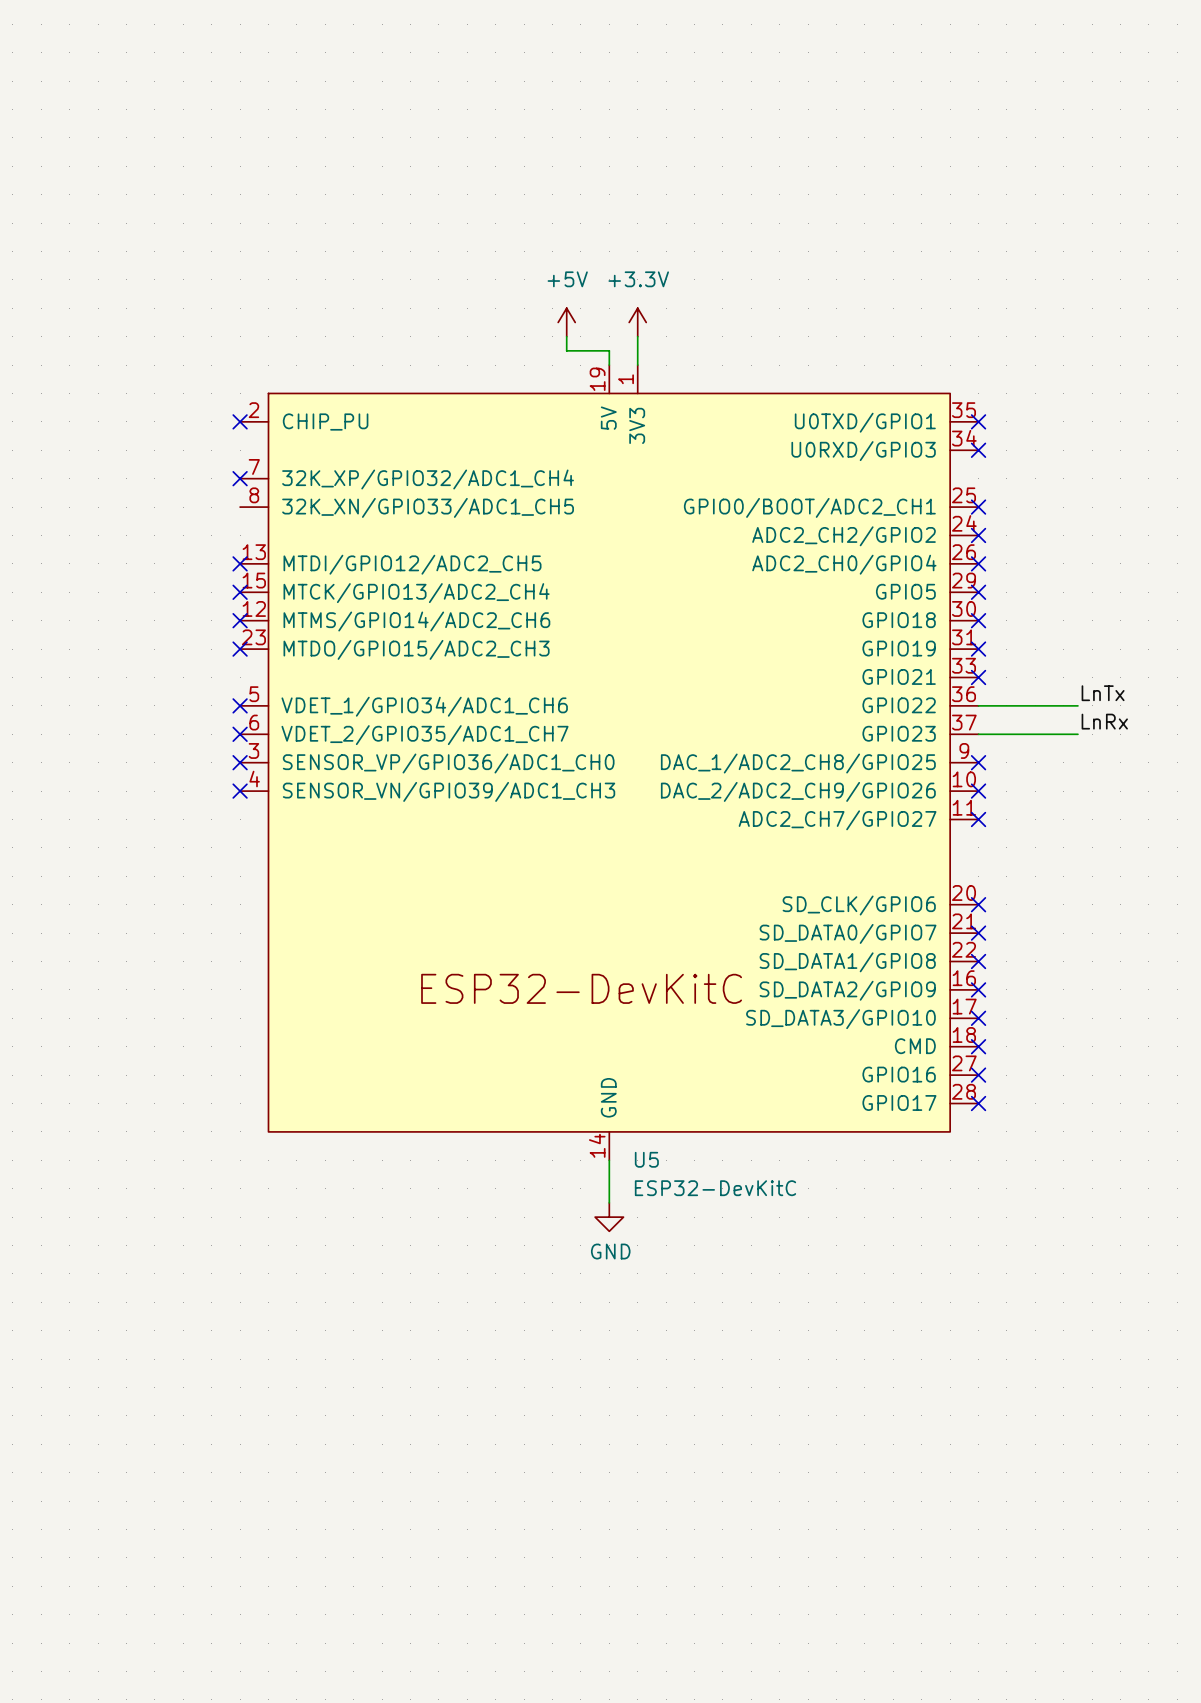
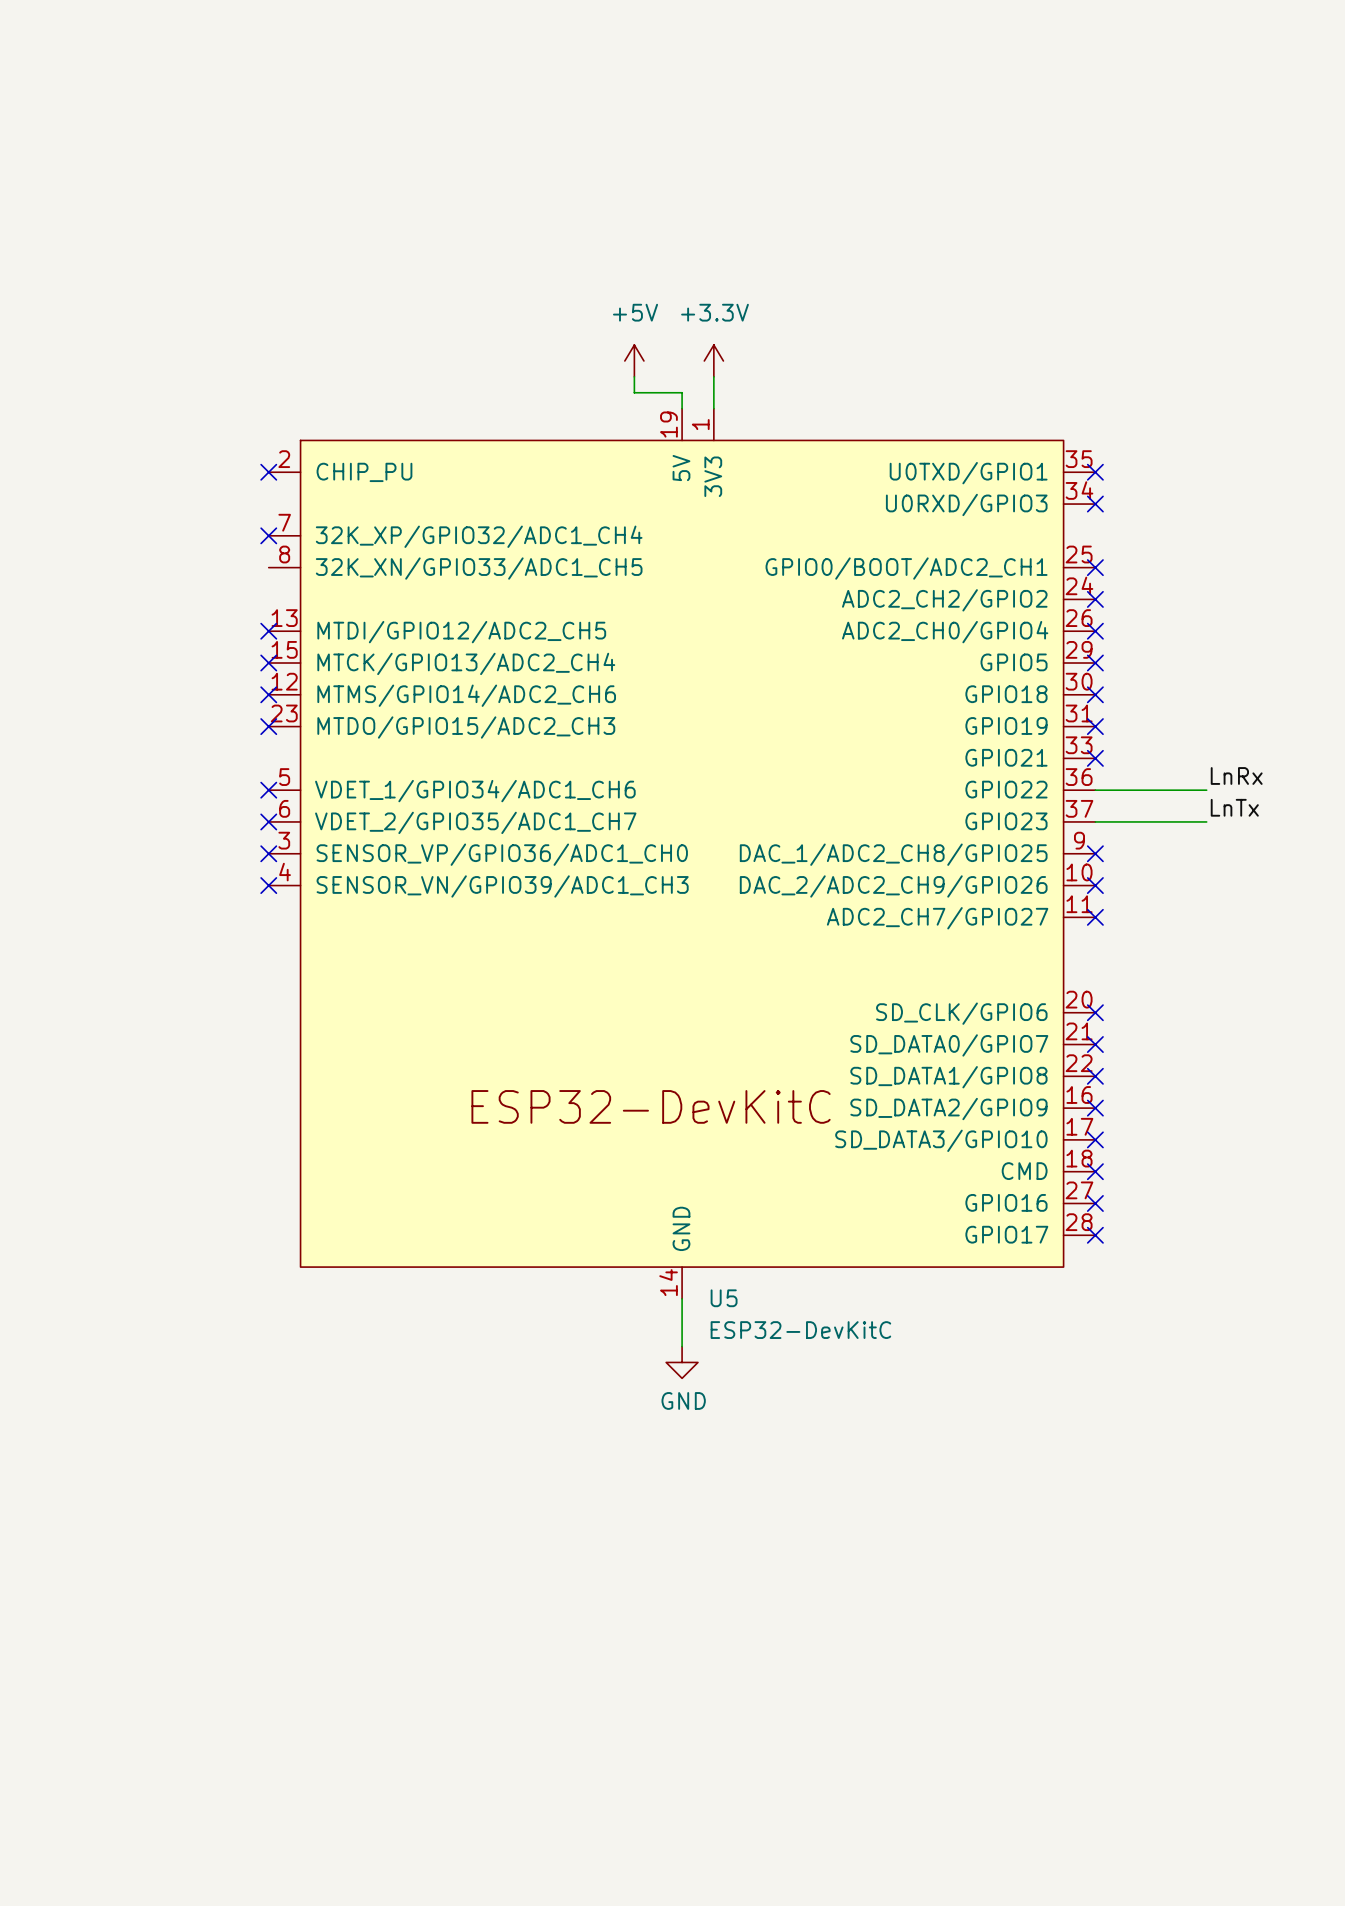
label: LnTx (1103, 693) -> LnRx (1236, 775)
label: LnRx (1104, 721) -> LnTx (1234, 807)

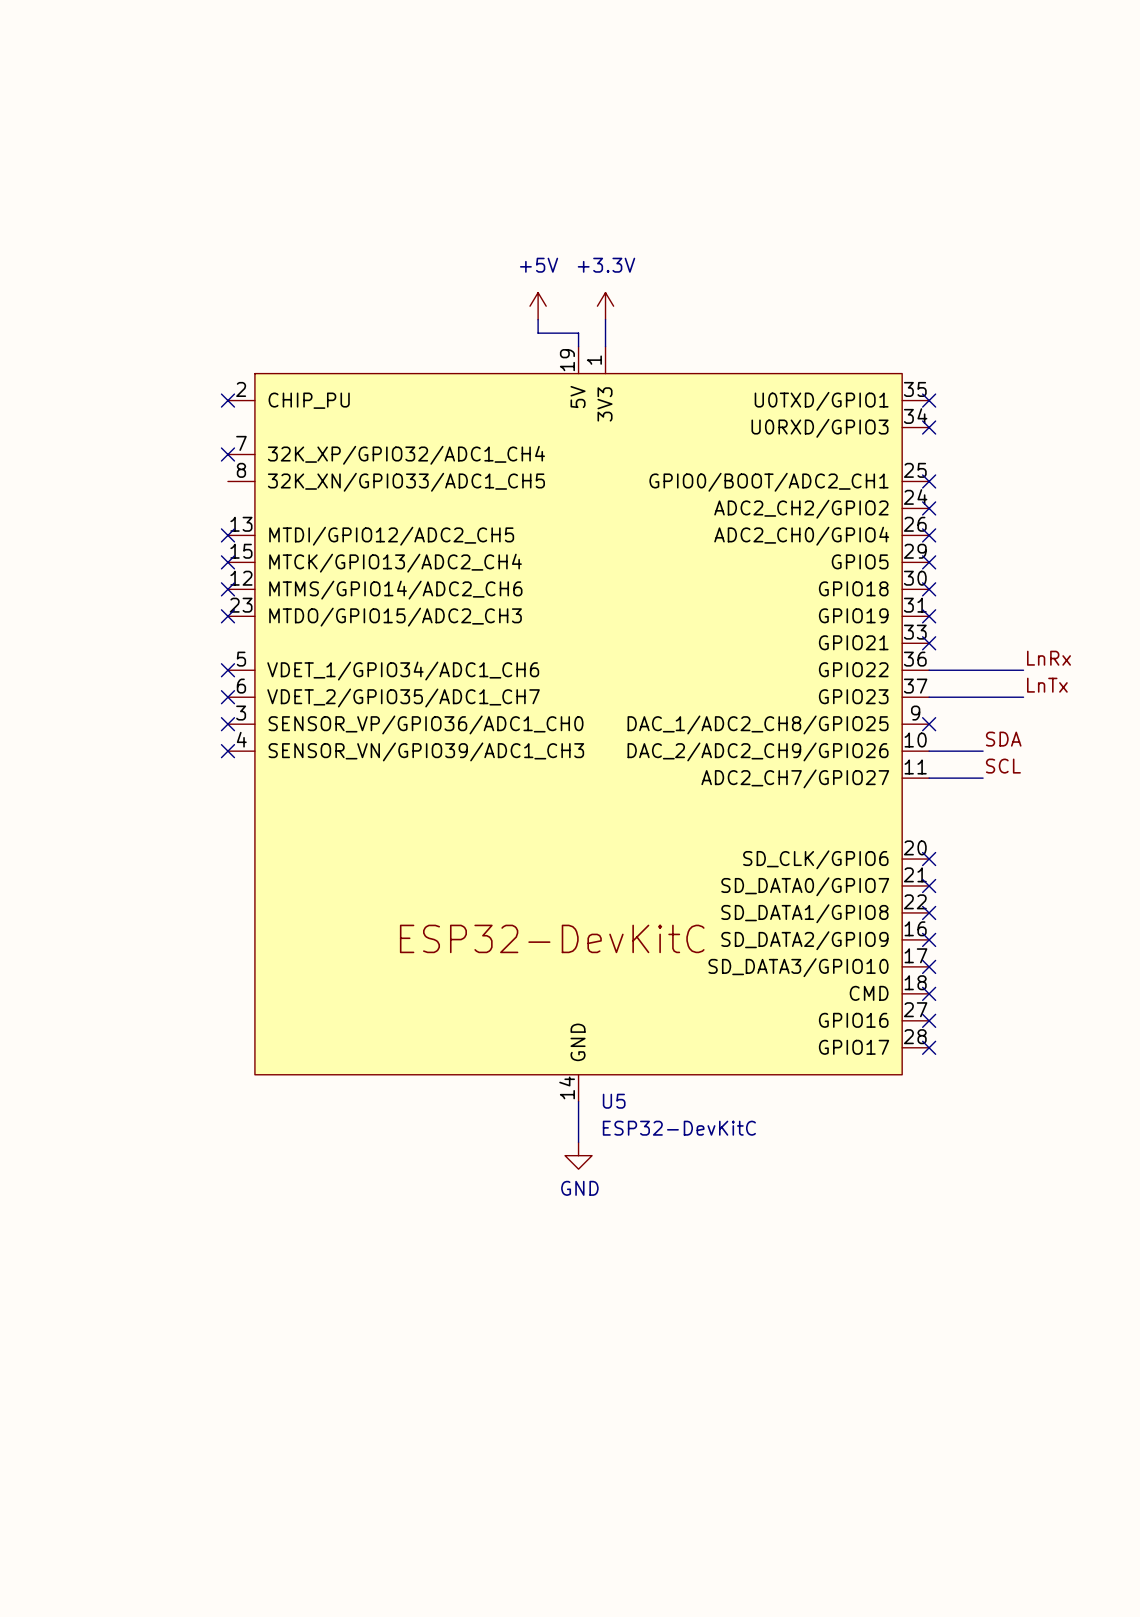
label: none -> SDA (1003, 739)
wire: none -> (929, 751) (983, 751)
no-connect mark: (1095, 885) -> none
label: none -> SCL (1003, 766)
wire: none -> (929, 778) (983, 778)
no-connect mark: (1095, 917) -> none

